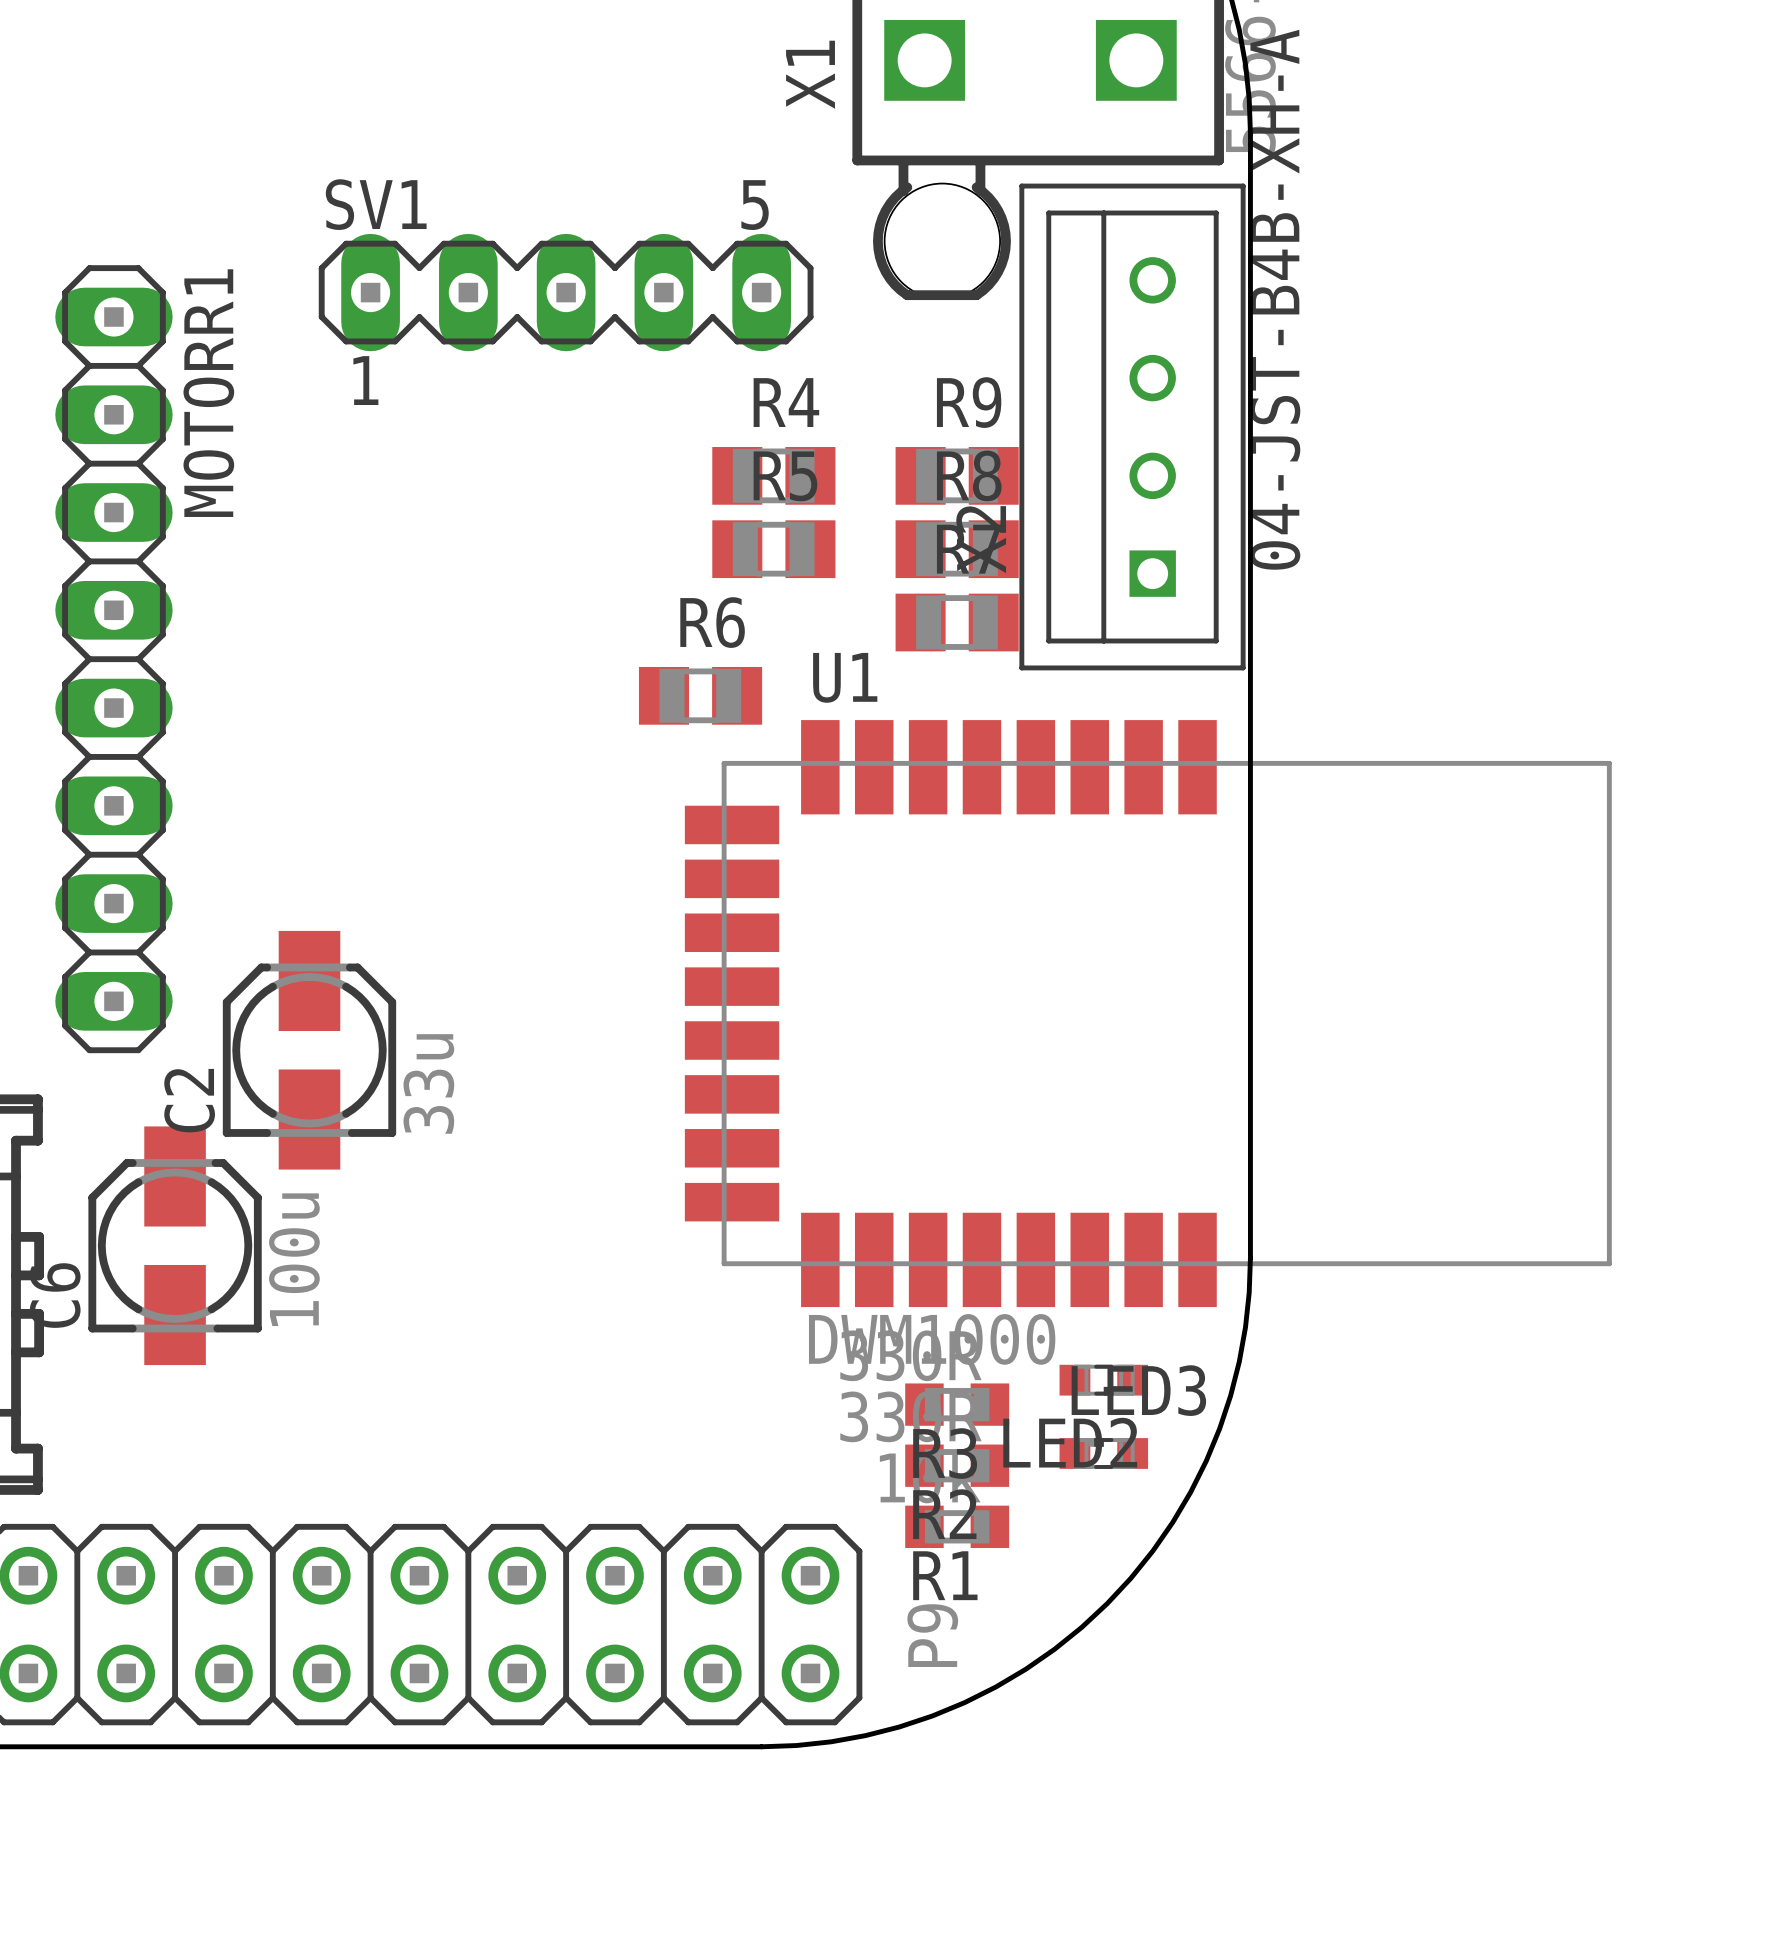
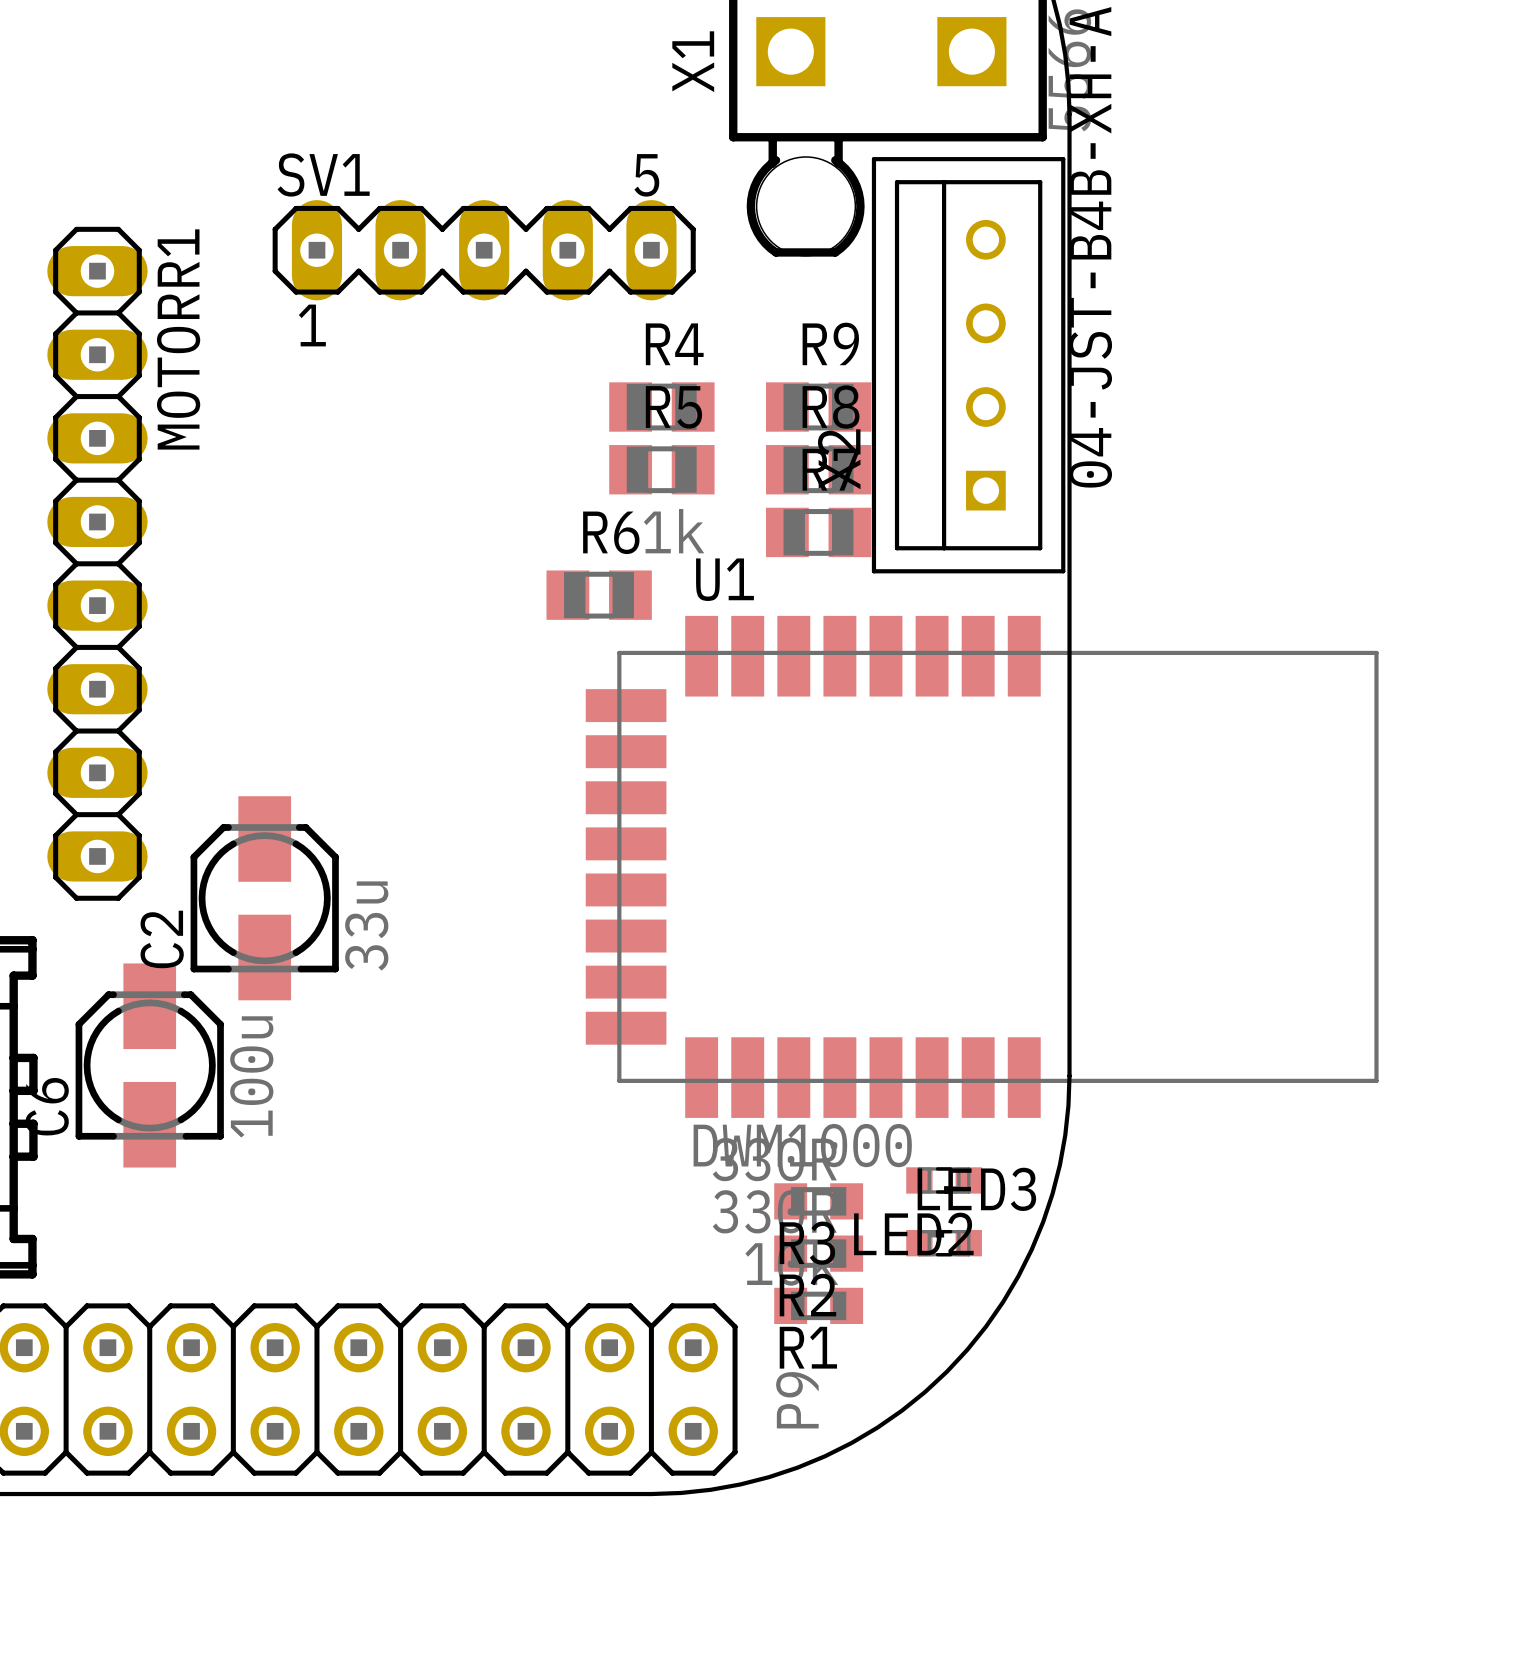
R5 value: none -> 1k (674, 531)

